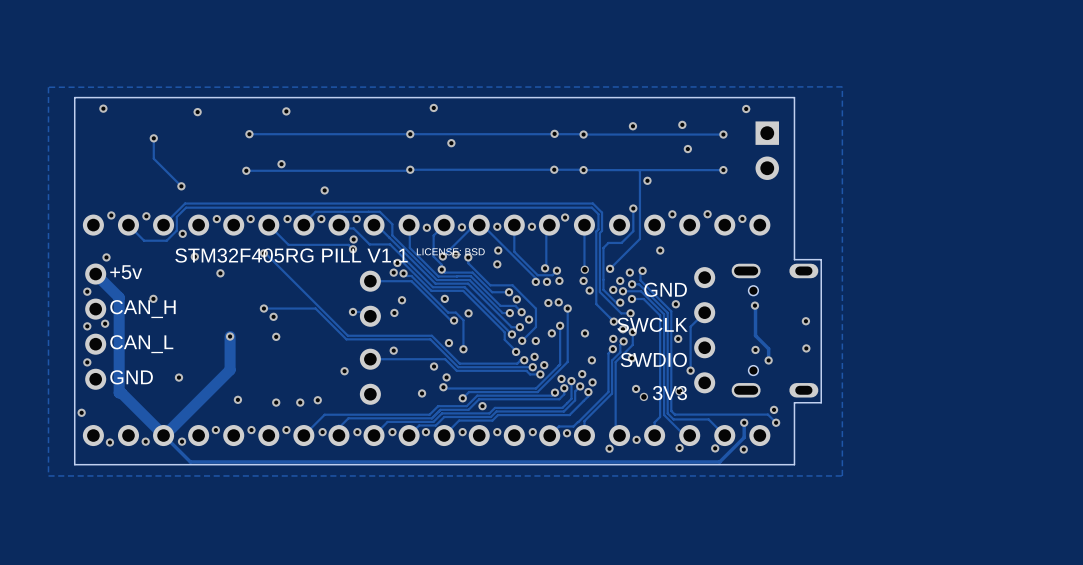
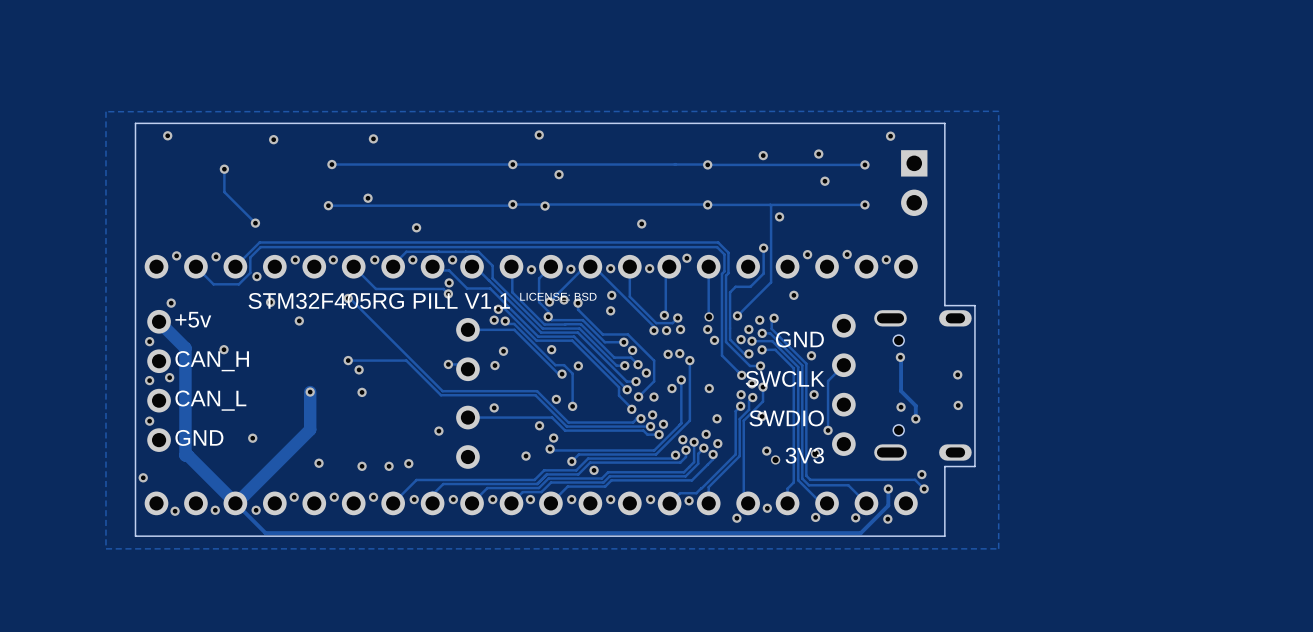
via: (554, 133) -> none
via: (554, 169) -> none
via: none -> (545, 206)
via: none -> (641, 223)

